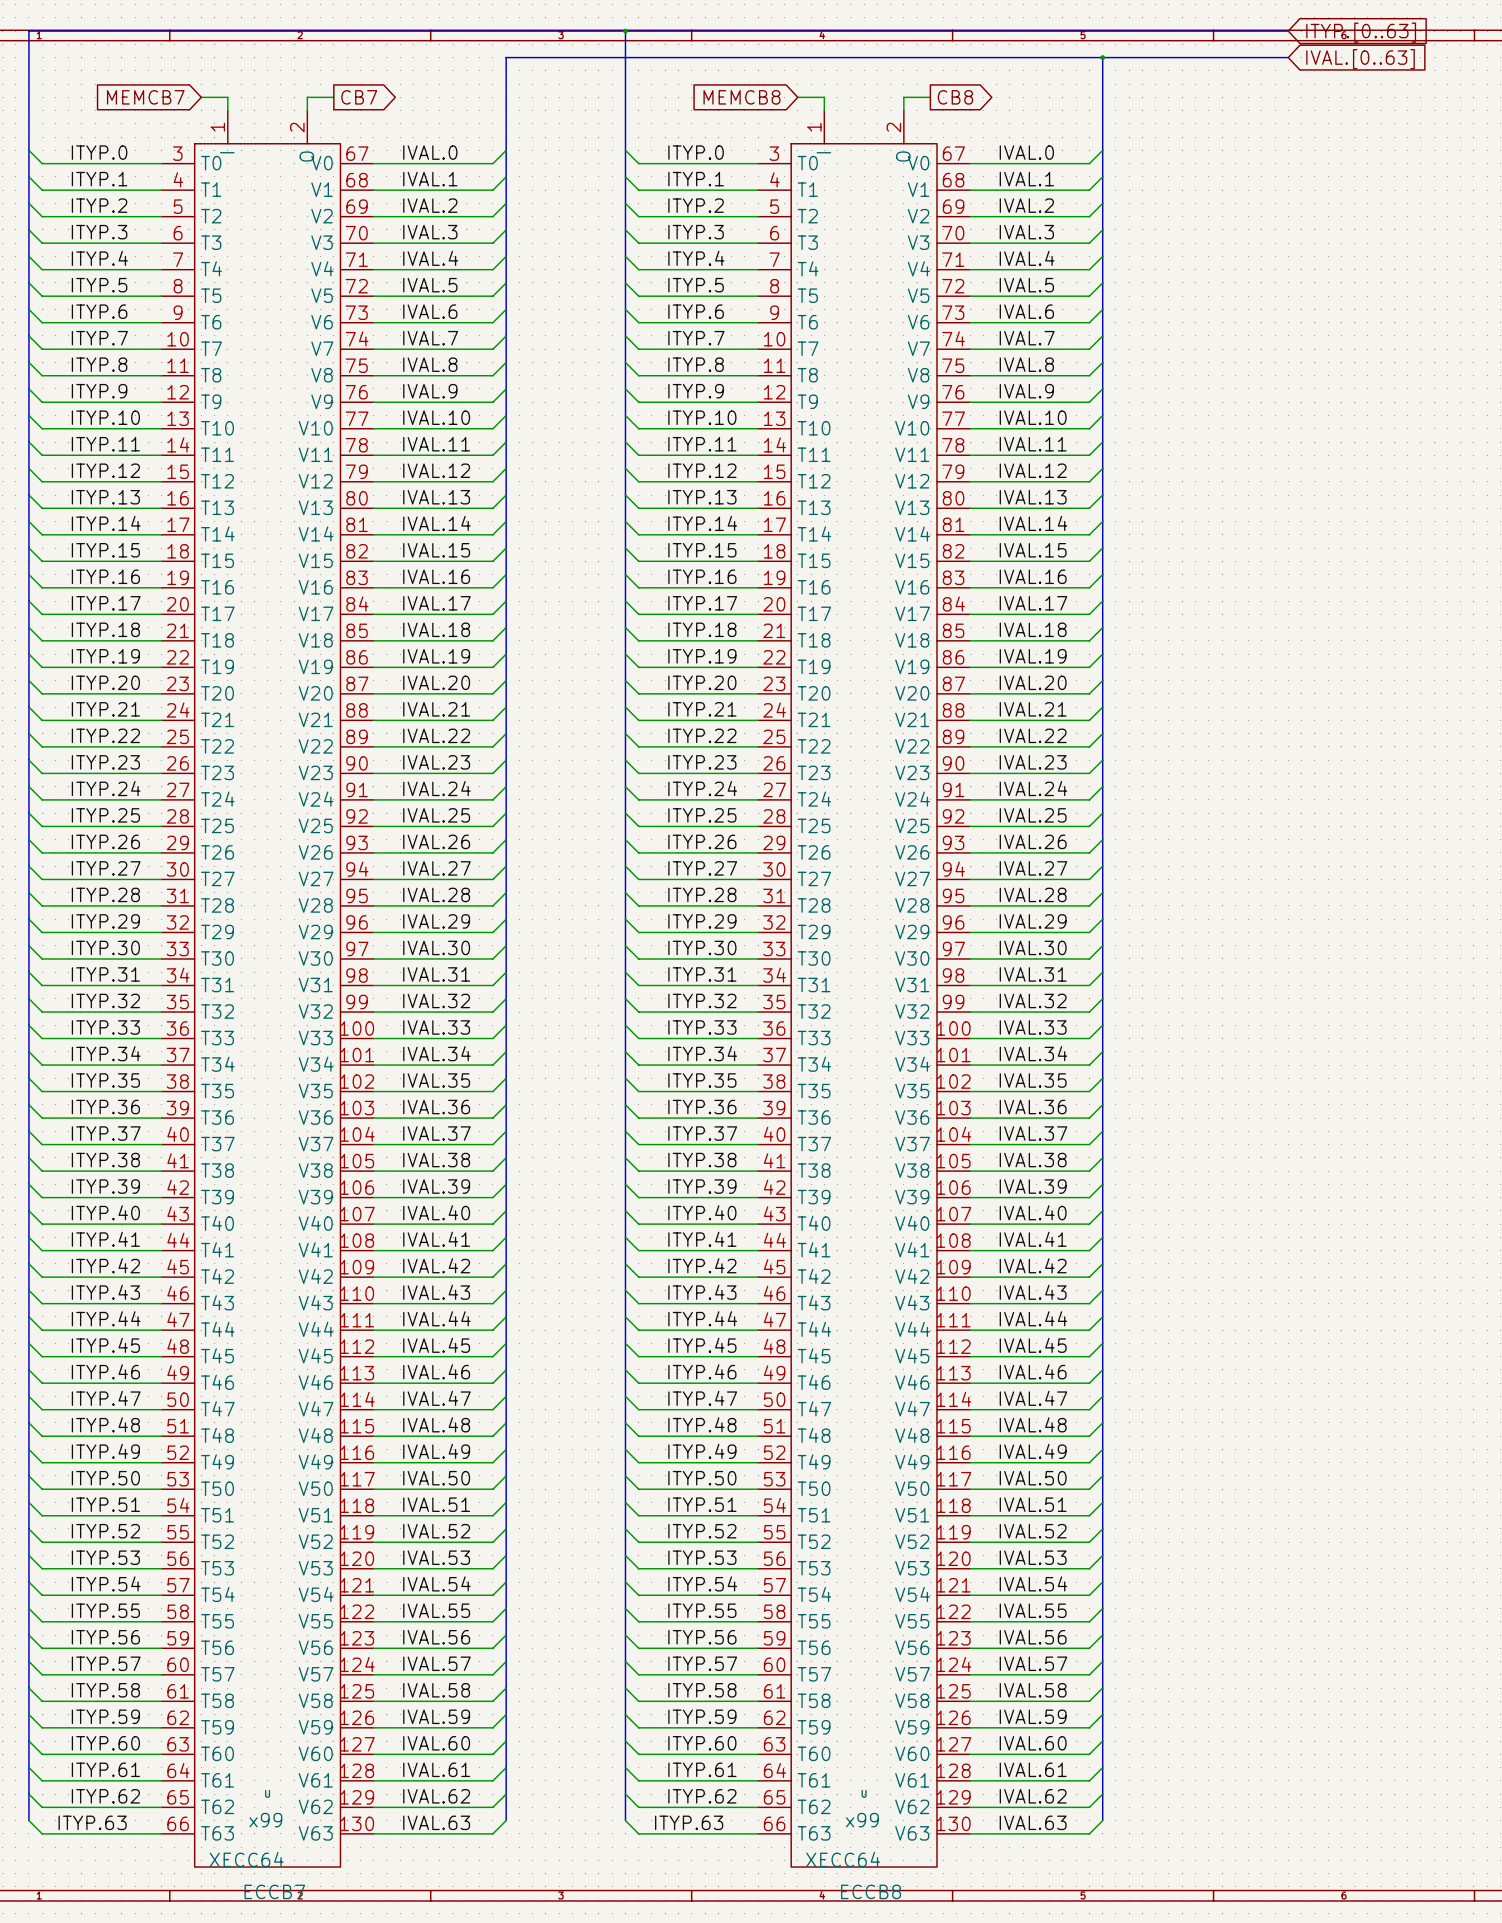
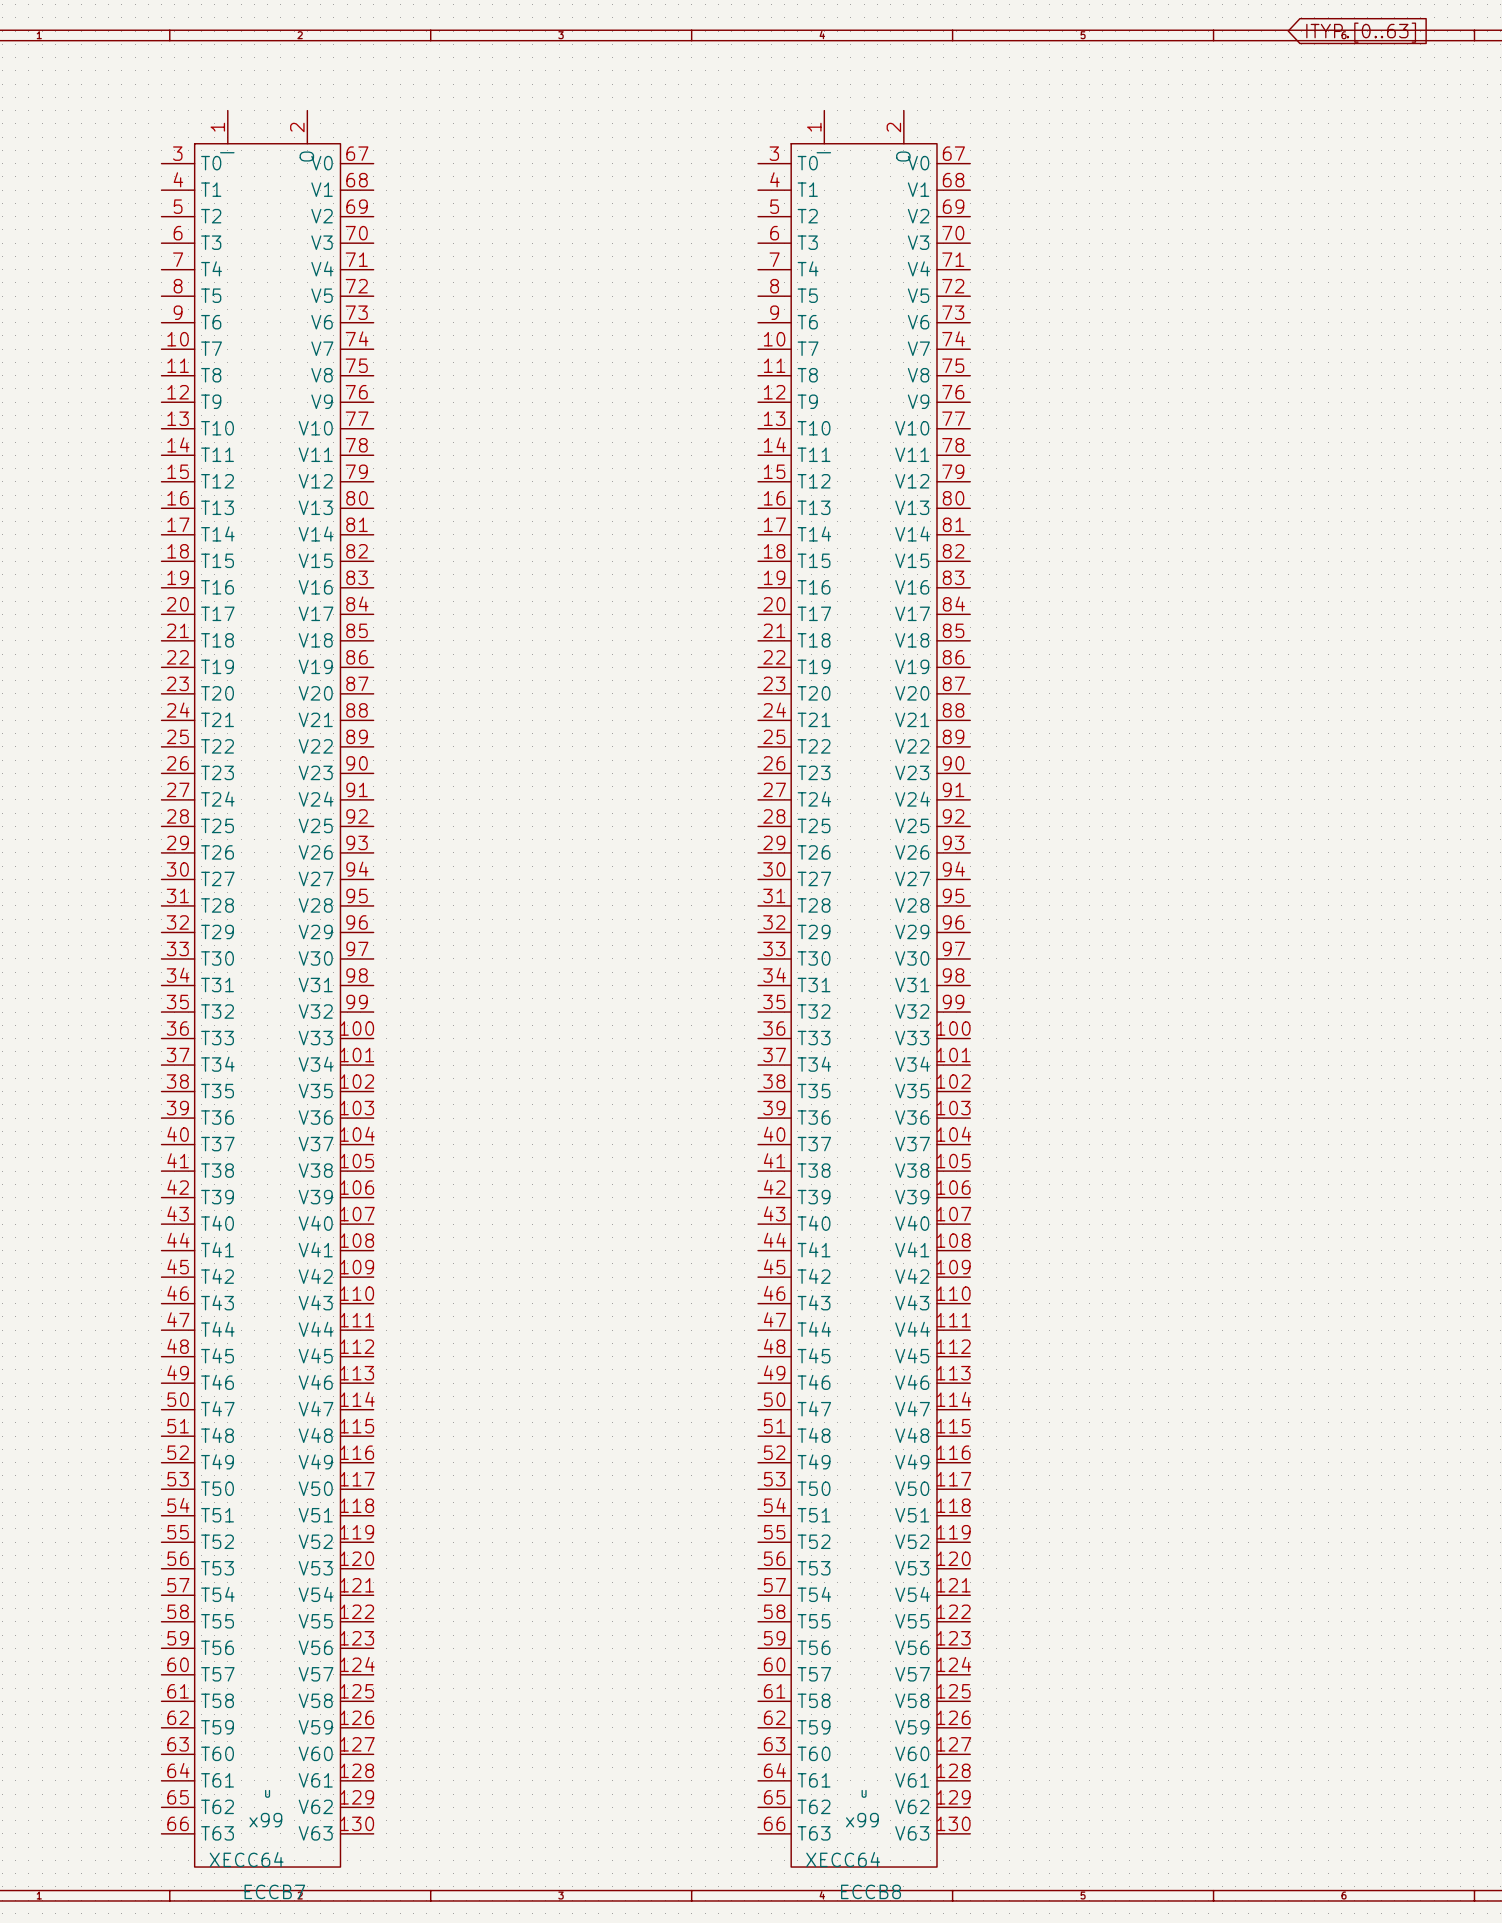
bus: (625, 31) (625, 1820) -> none
junction: (625, 31) -> none
bus: (1288, 31) (28, 31) (28, 1820) -> none
bus: (1102, 57) (1102, 1820) -> none
junction: (1102, 57) -> none
bus: (1288, 57) (506, 57) (506, 1820) -> none
global label: IVAL.[0..63] (1360, 59) -> none
global label: MEMCB7 (145, 97) -> none
wire: (201, 97) (227, 97) (227, 110) -> none
wire: (333, 97) (307, 97) (307, 110) -> none
global label: CB7 (359, 97) -> none
global label: MEMCB8 (741, 97) -> none
wire: (797, 97) (824, 97) (824, 110) -> none
wire: (930, 97) (903, 97) (903, 110) -> none
global label: CB8 (955, 97) -> none
wire: (28, 150) (42, 163) (161, 163) -> none
wire: (506, 150) (492, 163) (373, 163) -> none
wire: (625, 150) (638, 163) (758, 163) -> none
wire: (1102, 150) (1089, 163) (970, 163) -> none
label: ITYP.0 (99, 152) -> none
label: IVAL.0 (430, 152) -> none
label: ITYP.0 (696, 152) -> none
label: IVAL.0 (1026, 152) -> none
wire: (28, 176) (42, 190) (161, 190) -> none
wire: (506, 176) (492, 190) (373, 190) -> none
wire: (625, 176) (638, 190) (758, 190) -> none
wire: (1102, 176) (1089, 190) (970, 190) -> none
label: ITYP.1 (99, 179) -> none
label: IVAL.1 (430, 179) -> none
label: ITYP.1 (696, 179) -> none
label: IVAL.1 (1026, 179) -> none
wire: (28, 203) (42, 216) (161, 216) -> none
wire: (506, 203) (492, 216) (373, 216) -> none
wire: (625, 203) (638, 216) (758, 216) -> none
wire: (1102, 203) (1089, 216) (970, 216) -> none
label: ITYP.2 (99, 205) -> none
label: IVAL.2 (430, 205) -> none
label: ITYP.2 (696, 205) -> none
label: IVAL.2 (1026, 205) -> none
wire: (28, 229) (42, 243) (161, 243) -> none
wire: (506, 229) (492, 243) (373, 243) -> none
wire: (625, 229) (638, 243) (758, 243) -> none
wire: (1102, 229) (1089, 243) (970, 243) -> none
label: ITYP.3 (99, 232) -> none
label: IVAL.3 (430, 232) -> none
label: ITYP.3 (696, 232) -> none
label: IVAL.3 (1026, 232) -> none
wire: (28, 256) (42, 269) (161, 269) -> none
wire: (506, 256) (492, 269) (373, 269) -> none
wire: (625, 256) (638, 269) (758, 269) -> none
wire: (1102, 256) (1089, 269) (970, 269) -> none
label: ITYP.4 (99, 258) -> none
label: IVAL.4 (430, 258) -> none
label: ITYP.4 (696, 258) -> none
label: IVAL.4 (1027, 258) -> none
wire: (28, 282) (42, 296) (161, 296) -> none
wire: (506, 282) (492, 296) (373, 296) -> none
wire: (625, 282) (638, 296) (758, 296) -> none
wire: (1102, 282) (1089, 296) (970, 296) -> none
label: ITYP.5 (99, 285) -> none
label: IVAL.5 (430, 285) -> none
label: ITYP.5 (696, 285) -> none
label: IVAL.5 (1026, 285) -> none
wire: (28, 309) (42, 322) (161, 322) -> none
wire: (506, 309) (492, 322) (373, 322) -> none
wire: (625, 309) (638, 322) (758, 322) -> none
wire: (1102, 309) (1089, 322) (970, 322) -> none
label: ITYP.6 (99, 311) -> none
label: IVAL.6 (430, 311) -> none
label: ITYP.6 (696, 311) -> none
label: IVAL.6 (1026, 311) -> none
wire: (28, 335) (42, 349) (161, 349) -> none
wire: (506, 335) (492, 349) (373, 349) -> none
wire: (625, 335) (638, 349) (758, 349) -> none
wire: (1102, 335) (1089, 349) (970, 349) -> none
label: ITYP.7 (99, 338) -> none
label: IVAL.7 (430, 338) -> none
label: ITYP.7 (696, 338) -> none
label: IVAL.7 (1027, 338) -> none
wire: (28, 362) (42, 375) (161, 375) -> none
wire: (506, 362) (492, 375) (373, 375) -> none
wire: (625, 362) (638, 375) (758, 375) -> none
wire: (1102, 362) (1089, 375) (970, 375) -> none
label: ITYP.8 (99, 364) -> none
label: IVAL.8 (430, 364) -> none
label: ITYP.8 (696, 364) -> none
label: IVAL.8 (1026, 364) -> none
wire: (28, 388) (42, 402) (161, 402) -> none
wire: (506, 388) (492, 402) (373, 402) -> none
wire: (625, 388) (638, 402) (758, 402) -> none
wire: (1102, 388) (1089, 402) (970, 402) -> none
label: ITYP.9 (99, 391) -> none
label: IVAL.9 (430, 391) -> none
label: ITYP.9 (696, 391) -> none
label: IVAL.9 (1026, 391) -> none
wire: (28, 415) (42, 428) (161, 428) -> none
wire: (506, 415) (492, 428) (373, 428) -> none
wire: (625, 415) (638, 428) (758, 428) -> none
wire: (1102, 415) (1089, 428) (970, 428) -> none
label: ITYP.10 (105, 417) -> none
label: IVAL.10 (436, 417) -> none
label: ITYP.10 (702, 417) -> none
label: IVAL.10 (1033, 417) -> none
wire: (28, 442) (42, 455) (161, 455) -> none
wire: (506, 442) (492, 455) (373, 455) -> none
wire: (625, 442) (638, 455) (758, 455) -> none
wire: (1102, 442) (1089, 455) (970, 455) -> none
label: ITYP.11 (105, 444) -> none
label: IVAL.11 (436, 444) -> none
label: ITYP.11 (702, 444) -> none
label: IVAL.11 (1033, 444) -> none
wire: (28, 468) (42, 481) (161, 481) -> none
wire: (506, 468) (492, 481) (373, 481) -> none
wire: (625, 468) (638, 481) (758, 481) -> none
wire: (1102, 468) (1089, 481) (970, 481) -> none
label: ITYP.12 (105, 470) -> none
label: IVAL.12 (436, 470) -> none
label: ITYP.12 (702, 470) -> none
label: IVAL.12 (1033, 470) -> none
wire: (28, 495) (42, 508) (161, 508) -> none
wire: (506, 495) (492, 508) (373, 508) -> none
wire: (625, 495) (638, 508) (758, 508) -> none
wire: (1102, 495) (1089, 508) (970, 508) -> none
label: ITYP.13 (105, 497) -> none
label: IVAL.13 (436, 497) -> none
label: ITYP.13 (702, 497) -> none
label: IVAL.13 (1033, 497) -> none
wire: (28, 521) (42, 534) (161, 534) -> none
wire: (506, 521) (492, 534) (373, 534) -> none
wire: (625, 521) (638, 534) (758, 534) -> none
wire: (1102, 521) (1089, 534) (970, 534) -> none
label: ITYP.14 (106, 523) -> none
label: IVAL.14 (436, 523) -> none
label: ITYP.14 (702, 523) -> none
label: IVAL.14 (1033, 523) -> none
wire: (28, 548) (42, 561) (161, 561) -> none
wire: (506, 548) (492, 561) (373, 561) -> none
wire: (625, 548) (638, 561) (758, 561) -> none
wire: (1102, 548) (1089, 561) (970, 561) -> none
label: ITYP.15 (105, 550) -> none
label: IVAL.15 (436, 550) -> none
label: ITYP.15 (702, 550) -> none
label: IVAL.15 (1033, 550) -> none
wire: (28, 574) (42, 587) (161, 587) -> none
wire: (506, 574) (492, 587) (373, 587) -> none
wire: (625, 574) (638, 587) (758, 587) -> none
wire: (1102, 574) (1089, 587) (970, 587) -> none
label: ITYP.16 (105, 576) -> none
label: IVAL.16 (436, 576) -> none
label: ITYP.16 (702, 576) -> none
label: IVAL.16 (1033, 576) -> none
wire: (28, 601) (42, 614) (161, 614) -> none
wire: (506, 601) (492, 614) (373, 614) -> none
wire: (625, 601) (638, 614) (758, 614) -> none
wire: (1102, 601) (1089, 614) (970, 614) -> none
label: ITYP.17 (106, 603) -> none
label: IVAL.17 (436, 603) -> none
label: ITYP.17 (702, 603) -> none
label: IVAL.17 (1033, 603) -> none
wire: (28, 627) (42, 640) (161, 640) -> none
wire: (506, 627) (492, 640) (373, 640) -> none
wire: (625, 627) (638, 640) (758, 640) -> none
wire: (1102, 627) (1089, 640) (970, 640) -> none
label: ITYP.18 (105, 629) -> none
label: IVAL.18 (436, 629) -> none
label: ITYP.18 (702, 629) -> none
label: IVAL.18 (1033, 629) -> none
wire: (28, 654) (42, 667) (161, 667) -> none
wire: (506, 654) (492, 667) (373, 667) -> none
wire: (625, 654) (638, 667) (758, 667) -> none
wire: (1102, 654) (1089, 667) (970, 667) -> none
label: ITYP.19 (105, 656) -> none
label: IVAL.19 (436, 656) -> none
label: ITYP.19 (702, 656) -> none
label: IVAL.19 (1033, 656) -> none
wire: (28, 680) (42, 693) (161, 693) -> none
wire: (506, 680) (492, 693) (373, 693) -> none
wire: (625, 680) (638, 693) (758, 693) -> none
wire: (1102, 680) (1089, 693) (970, 693) -> none
label: ITYP.20 (105, 682) -> none
label: IVAL.20 (436, 682) -> none
label: ITYP.20 (702, 682) -> none
label: IVAL.20 (1033, 682) -> none
wire: (28, 707) (42, 720) (161, 720) -> none
wire: (506, 707) (492, 720) (373, 720) -> none
wire: (625, 707) (638, 720) (758, 720) -> none
wire: (1102, 707) (1089, 720) (970, 720) -> none
label: ITYP.21 (105, 709) -> none
label: IVAL.21 (436, 709) -> none
label: ITYP.21 (702, 709) -> none
label: IVAL.21 (1033, 709) -> none
wire: (28, 733) (42, 746) (161, 746) -> none
wire: (506, 733) (492, 746) (373, 746) -> none
wire: (625, 733) (638, 746) (758, 746) -> none
wire: (1102, 733) (1089, 746) (970, 746) -> none
label: ITYP.22 (105, 735) -> none
label: IVAL.22 (436, 735) -> none
label: ITYP.22 (702, 735) -> none
label: IVAL.22 (1033, 735) -> none
wire: (28, 760) (42, 773) (161, 773) -> none
wire: (506, 760) (492, 773) (373, 773) -> none
wire: (625, 760) (638, 773) (758, 773) -> none
wire: (1102, 760) (1089, 773) (970, 773) -> none
label: ITYP.23 (105, 762) -> none
label: IVAL.23 (436, 762) -> none
label: ITYP.23 (702, 762) -> none
label: IVAL.23 (1033, 762) -> none
wire: (28, 786) (42, 799) (161, 799) -> none
wire: (506, 786) (492, 799) (373, 799) -> none
wire: (625, 786) (638, 799) (758, 799) -> none
wire: (1102, 786) (1089, 799) (970, 799) -> none
label: ITYP.24 (106, 788) -> none
label: IVAL.24 (436, 788) -> none
label: ITYP.24 (702, 788) -> none
label: IVAL.24 (1033, 788) -> none
wire: (28, 813) (42, 826) (161, 826) -> none
wire: (506, 813) (492, 826) (373, 826) -> none
wire: (625, 813) (638, 826) (758, 826) -> none
wire: (1102, 813) (1089, 826) (970, 826) -> none
label: ITYP.25 (105, 815) -> none
label: IVAL.25 (436, 815) -> none
label: ITYP.25 (702, 815) -> none
label: IVAL.25 (1033, 815) -> none
wire: (28, 839) (42, 852) (161, 852) -> none
wire: (506, 839) (492, 852) (373, 852) -> none
wire: (625, 839) (638, 852) (758, 852) -> none
wire: (1102, 839) (1089, 852) (970, 852) -> none
label: ITYP.26 (105, 841) -> none
label: IVAL.26 (436, 841) -> none
label: ITYP.26 (702, 841) -> none
label: IVAL.26 (1033, 841) -> none
wire: (28, 866) (42, 879) (161, 879) -> none
wire: (506, 866) (492, 879) (373, 879) -> none
wire: (625, 866) (638, 879) (758, 879) -> none
wire: (1102, 866) (1089, 879) (970, 879) -> none
label: ITYP.27 (106, 868) -> none
label: IVAL.27 (436, 868) -> none
label: ITYP.27 (702, 868) -> none
label: IVAL.27 (1033, 868) -> none
wire: (28, 892) (42, 905) (161, 905) -> none
wire: (506, 892) (492, 905) (373, 905) -> none
wire: (625, 892) (638, 905) (758, 905) -> none
wire: (1102, 892) (1089, 905) (970, 905) -> none
label: ITYP.28 (105, 894) -> none
label: IVAL.28 (436, 894) -> none
label: ITYP.28 (702, 894) -> none
label: IVAL.28 (1033, 894) -> none
wire: (28, 919) (42, 932) (161, 932) -> none
wire: (506, 919) (492, 932) (373, 932) -> none
wire: (625, 919) (638, 932) (758, 932) -> none
wire: (1102, 919) (1089, 932) (970, 932) -> none
label: ITYP.29 (105, 921) -> none
label: IVAL.29 (436, 921) -> none
label: ITYP.29 (702, 921) -> none
label: IVAL.29 (1033, 921) -> none
wire: (28, 945) (42, 958) (161, 958) -> none
wire: (506, 945) (492, 958) (373, 958) -> none
wire: (625, 945) (638, 958) (758, 958) -> none
wire: (1102, 945) (1089, 958) (970, 958) -> none
label: ITYP.30 (105, 947) -> none
label: IVAL.30 (436, 947) -> none
label: ITYP.30 (702, 947) -> none
label: IVAL.30 (1033, 947) -> none
wire: (28, 972) (42, 985) (161, 985) -> none
wire: (506, 972) (492, 985) (373, 985) -> none
wire: (625, 972) (638, 985) (758, 985) -> none
wire: (1102, 972) (1089, 985) (970, 985) -> none
label: ITYP.31 (105, 974) -> none
label: IVAL.31 (436, 974) -> none
label: ITYP.31 (702, 974) -> none
label: IVAL.31 (1033, 974) -> none
wire: (28, 998) (42, 1012) (161, 1012) -> none
wire: (506, 998) (492, 1012) (373, 1012) -> none
wire: (625, 998) (638, 1012) (758, 1012) -> none
wire: (1102, 998) (1089, 1012) (970, 1012) -> none
label: ITYP.32 (105, 1000) -> none
label: IVAL.32 (436, 1000) -> none
label: ITYP.32 (702, 1000) -> none
label: IVAL.32 (1033, 1000) -> none
wire: (28, 1025) (42, 1038) (161, 1038) -> none
wire: (506, 1025) (492, 1038) (373, 1038) -> none
wire: (625, 1025) (638, 1038) (758, 1038) -> none
wire: (1102, 1025) (1089, 1038) (970, 1038) -> none
label: ITYP.33 (105, 1027) -> none
label: IVAL.33 (436, 1027) -> none
label: ITYP.33 (702, 1027) -> none
label: IVAL.33 (1033, 1027) -> none
wire: (28, 1051) (42, 1065) (161, 1065) -> none
wire: (506, 1051) (492, 1065) (373, 1065) -> none
wire: (625, 1051) (638, 1065) (758, 1065) -> none
wire: (1102, 1051) (1089, 1065) (970, 1065) -> none
label: ITYP.34 (106, 1053) -> none
label: IVAL.34 (436, 1053) -> none
label: ITYP.34 (702, 1053) -> none
label: IVAL.34 (1033, 1053) -> none
wire: (28, 1078) (42, 1091) (161, 1091) -> none
wire: (506, 1078) (492, 1091) (373, 1091) -> none
wire: (625, 1078) (638, 1091) (758, 1091) -> none
wire: (1102, 1078) (1089, 1091) (970, 1091) -> none
label: ITYP.35 (105, 1080) -> none
label: IVAL.35 (436, 1080) -> none
label: ITYP.35 (702, 1080) -> none
label: IVAL.35 (1033, 1080) -> none
wire: (28, 1104) (42, 1118) (161, 1118) -> none
wire: (506, 1104) (492, 1118) (373, 1118) -> none
wire: (625, 1104) (638, 1118) (758, 1118) -> none
wire: (1102, 1104) (1089, 1118) (970, 1118) -> none
label: ITYP.36 (105, 1107) -> none
label: IVAL.36 (436, 1107) -> none
label: ITYP.36 (702, 1107) -> none
label: IVAL.36 (1033, 1107) -> none
wire: (28, 1131) (42, 1144) (161, 1144) -> none
wire: (506, 1131) (492, 1144) (373, 1144) -> none
wire: (625, 1131) (638, 1144) (758, 1144) -> none
wire: (1102, 1131) (1089, 1144) (970, 1144) -> none
label: ITYP.37 (106, 1133) -> none
label: IVAL.37 (436, 1133) -> none
label: ITYP.37 (702, 1133) -> none
label: IVAL.37 (1033, 1133) -> none
wire: (28, 1157) (42, 1171) (161, 1171) -> none
wire: (506, 1157) (492, 1171) (373, 1171) -> none
wire: (625, 1157) (638, 1171) (758, 1171) -> none
wire: (1102, 1157) (1089, 1171) (970, 1171) -> none
label: ITYP.38 (105, 1160) -> none
label: IVAL.38 (436, 1160) -> none
label: ITYP.38 (702, 1160) -> none
label: IVAL.38 (1033, 1160) -> none
wire: (28, 1184) (42, 1197) (161, 1197) -> none
wire: (506, 1184) (492, 1197) (373, 1197) -> none
wire: (625, 1184) (638, 1197) (758, 1197) -> none
wire: (1102, 1184) (1089, 1197) (970, 1197) -> none
label: ITYP.39 (105, 1186) -> none
label: IVAL.39 (436, 1186) -> none
label: ITYP.39 (702, 1186) -> none
label: IVAL.39 (1033, 1186) -> none
wire: (28, 1210) (42, 1224) (161, 1224) -> none
wire: (506, 1210) (492, 1224) (373, 1224) -> none
wire: (625, 1210) (638, 1224) (758, 1224) -> none
wire: (1102, 1210) (1089, 1224) (970, 1224) -> none
label: ITYP.40 (105, 1212) -> none
label: IVAL.40 (436, 1212) -> none
label: ITYP.40 (702, 1212) -> none
label: IVAL.40 (1033, 1212) -> none
wire: (28, 1237) (42, 1250) (161, 1250) -> none
wire: (506, 1237) (492, 1250) (373, 1250) -> none
wire: (625, 1237) (638, 1250) (758, 1250) -> none
wire: (1102, 1237) (1089, 1250) (970, 1250) -> none
label: ITYP.41 (105, 1239) -> none
label: IVAL.41 (436, 1239) -> none
label: ITYP.41 (702, 1239) -> none
label: IVAL.41 (1033, 1239) -> none
wire: (28, 1263) (42, 1277) (161, 1277) -> none
wire: (506, 1263) (492, 1277) (373, 1277) -> none
wire: (625, 1263) (638, 1277) (758, 1277) -> none
wire: (1102, 1263) (1089, 1277) (970, 1277) -> none
label: ITYP.42 (105, 1265) -> none
label: IVAL.42 (436, 1265) -> none
label: ITYP.42 (702, 1265) -> none
label: IVAL.42 (1033, 1265) -> none
wire: (28, 1290) (42, 1303) (161, 1303) -> none
wire: (506, 1290) (492, 1303) (373, 1303) -> none
wire: (625, 1290) (638, 1303) (758, 1303) -> none
wire: (1102, 1290) (1089, 1303) (970, 1303) -> none
label: ITYP.43 (105, 1292) -> none
label: IVAL.43 (436, 1292) -> none
label: ITYP.43 (702, 1292) -> none
label: IVAL.43 (1033, 1292) -> none
wire: (28, 1316) (42, 1330) (161, 1330) -> none
wire: (506, 1316) (492, 1330) (373, 1330) -> none
wire: (625, 1316) (638, 1330) (758, 1330) -> none
wire: (1102, 1316) (1089, 1330) (970, 1330) -> none
label: ITYP.44 (106, 1318) -> none
label: IVAL.44 (436, 1318) -> none
label: ITYP.44 (702, 1318) -> none
label: IVAL.44 (1033, 1318) -> none
wire: (28, 1343) (42, 1356) (161, 1356) -> none
wire: (506, 1343) (492, 1356) (373, 1356) -> none
wire: (625, 1343) (638, 1356) (758, 1356) -> none
wire: (1102, 1343) (1089, 1356) (970, 1356) -> none
label: ITYP.45 (105, 1345) -> none
label: IVAL.45 (436, 1345) -> none
label: ITYP.45 (702, 1345) -> none
label: IVAL.45 (1033, 1345) -> none
wire: (28, 1369) (42, 1383) (161, 1383) -> none
wire: (506, 1369) (492, 1383) (373, 1383) -> none
wire: (625, 1369) (638, 1383) (758, 1383) -> none
wire: (1102, 1369) (1089, 1383) (970, 1383) -> none
label: ITYP.46 (105, 1371) -> none
label: IVAL.46 (436, 1371) -> none
label: ITYP.46 (702, 1371) -> none
label: IVAL.46 (1033, 1371) -> none
wire: (28, 1396) (42, 1409) (161, 1409) -> none
wire: (506, 1396) (492, 1409) (373, 1409) -> none
wire: (625, 1396) (638, 1409) (758, 1409) -> none
wire: (1102, 1396) (1089, 1409) (970, 1409) -> none
label: ITYP.47 (106, 1398) -> none
label: IVAL.47 (436, 1398) -> none
label: ITYP.47 (702, 1398) -> none
label: IVAL.47 (1033, 1398) -> none
wire: (28, 1422) (42, 1436) (161, 1436) -> none
wire: (506, 1422) (492, 1436) (373, 1436) -> none
wire: (625, 1422) (638, 1436) (758, 1436) -> none
wire: (1102, 1422) (1089, 1436) (970, 1436) -> none
label: ITYP.48 (105, 1424) -> none
label: IVAL.48 (436, 1424) -> none
label: ITYP.48 (702, 1424) -> none
label: IVAL.48 (1033, 1424) -> none
wire: (28, 1449) (42, 1462) (161, 1462) -> none
wire: (506, 1449) (492, 1462) (373, 1462) -> none
wire: (625, 1449) (638, 1462) (758, 1462) -> none
wire: (1102, 1449) (1089, 1462) (970, 1462) -> none
label: ITYP.49 (105, 1451) -> none
label: IVAL.49 (436, 1451) -> none
label: ITYP.49 (702, 1451) -> none
label: IVAL.49 (1033, 1451) -> none
wire: (28, 1475) (42, 1489) (161, 1489) -> none
wire: (506, 1475) (492, 1489) (373, 1489) -> none
wire: (625, 1475) (638, 1489) (758, 1489) -> none
wire: (1102, 1475) (1089, 1489) (970, 1489) -> none
label: ITYP.50 (105, 1478) -> none
label: IVAL.50 (436, 1478) -> none
label: ITYP.50 (702, 1478) -> none
label: IVAL.50 (1033, 1478) -> none
wire: (28, 1502) (42, 1515) (161, 1515) -> none
wire: (506, 1502) (492, 1515) (373, 1515) -> none
wire: (625, 1502) (638, 1515) (758, 1515) -> none
wire: (1102, 1502) (1089, 1515) (970, 1515) -> none
label: ITYP.51 (105, 1504) -> none
label: IVAL.51 (436, 1504) -> none
label: ITYP.51 (702, 1504) -> none
label: IVAL.51 (1033, 1504) -> none
wire: (28, 1528) (42, 1542) (161, 1542) -> none
wire: (506, 1528) (492, 1542) (373, 1542) -> none
wire: (625, 1528) (638, 1542) (758, 1542) -> none
wire: (1102, 1528) (1089, 1542) (970, 1542) -> none
label: ITYP.52 (105, 1531) -> none
label: IVAL.52 (436, 1531) -> none
label: ITYP.52 (702, 1531) -> none
label: IVAL.52 (1033, 1531) -> none
wire: (28, 1555) (42, 1568) (161, 1568) -> none
wire: (506, 1555) (492, 1568) (373, 1568) -> none
wire: (625, 1555) (638, 1568) (758, 1568) -> none
wire: (1102, 1555) (1089, 1568) (970, 1568) -> none
label: ITYP.53 (105, 1557) -> none
label: IVAL.53 (436, 1557) -> none
label: ITYP.53 (702, 1557) -> none
label: IVAL.53 (1033, 1557) -> none
wire: (28, 1582) (42, 1595) (161, 1595) -> none
wire: (506, 1582) (492, 1595) (373, 1595) -> none
wire: (625, 1582) (638, 1595) (758, 1595) -> none
wire: (1102, 1582) (1089, 1595) (970, 1595) -> none
label: ITYP.54 (106, 1583) -> none
label: IVAL.54 (436, 1583) -> none
label: ITYP.54 (702, 1583) -> none
label: IVAL.54 (1033, 1583) -> none
wire: (28, 1608) (42, 1621) (161, 1621) -> none
wire: (506, 1608) (492, 1621) (373, 1621) -> none
wire: (625, 1608) (638, 1621) (758, 1621) -> none
wire: (1102, 1608) (1089, 1621) (970, 1621) -> none
label: ITYP.55 (105, 1610) -> none
label: IVAL.55 (436, 1610) -> none
label: ITYP.55 (702, 1610) -> none
label: IVAL.55 (1033, 1610) -> none
wire: (28, 1635) (42, 1648) (161, 1648) -> none
wire: (506, 1635) (492, 1648) (373, 1648) -> none
wire: (625, 1635) (638, 1648) (758, 1648) -> none
wire: (1102, 1635) (1089, 1648) (970, 1648) -> none
label: ITYP.56 (105, 1637) -> none
label: IVAL.56 (436, 1637) -> none
label: ITYP.56 (702, 1637) -> none
label: IVAL.56 (1033, 1637) -> none
wire: (28, 1661) (42, 1674) (161, 1674) -> none
wire: (506, 1661) (492, 1674) (373, 1674) -> none
wire: (625, 1661) (638, 1674) (758, 1674) -> none
wire: (1102, 1661) (1089, 1674) (970, 1674) -> none
label: ITYP.57 (106, 1663) -> none
label: IVAL.57 (436, 1663) -> none
label: ITYP.57 (702, 1663) -> none
label: IVAL.57 (1033, 1663) -> none
wire: (28, 1688) (42, 1701) (161, 1701) -> none
wire: (506, 1688) (492, 1701) (373, 1701) -> none
wire: (625, 1688) (638, 1701) (758, 1701) -> none
wire: (1102, 1688) (1089, 1701) (970, 1701) -> none
label: ITYP.58 (105, 1690) -> none
label: IVAL.58 (436, 1690) -> none
label: ITYP.58 (702, 1690) -> none
label: IVAL.58 (1033, 1690) -> none
wire: (28, 1714) (42, 1727) (161, 1727) -> none
wire: (506, 1714) (492, 1727) (373, 1727) -> none
wire: (625, 1714) (638, 1727) (758, 1727) -> none
wire: (1102, 1714) (1089, 1727) (970, 1727) -> none
label: ITYP.59 (105, 1716) -> none
label: IVAL.59 (436, 1716) -> none
label: ITYP.59 (702, 1716) -> none
label: IVAL.59 (1033, 1716) -> none
wire: (28, 1741) (42, 1754) (161, 1754) -> none
wire: (506, 1741) (492, 1754) (373, 1754) -> none
wire: (625, 1741) (638, 1754) (758, 1754) -> none
wire: (1102, 1741) (1089, 1754) (970, 1754) -> none
label: ITYP.60 (105, 1743) -> none
label: IVAL.60 (436, 1743) -> none
label: ITYP.60 (702, 1743) -> none
label: IVAL.60 (1033, 1743) -> none
wire: (28, 1767) (42, 1780) (161, 1780) -> none
wire: (506, 1767) (492, 1780) (373, 1780) -> none
wire: (625, 1767) (638, 1780) (758, 1780) -> none
wire: (1102, 1767) (1089, 1780) (970, 1780) -> none
label: ITYP.61 (105, 1769) -> none
label: IVAL.61 (436, 1769) -> none
label: ITYP.61 (702, 1769) -> none
label: IVAL.61 (1033, 1769) -> none
wire: (28, 1794) (42, 1807) (161, 1807) -> none
wire: (506, 1794) (492, 1807) (373, 1807) -> none
wire: (625, 1794) (638, 1807) (758, 1807) -> none
wire: (1102, 1794) (1089, 1807) (970, 1807) -> none
label: ITYP.62 (105, 1796) -> none
label: IVAL.62 (436, 1796) -> none
label: ITYP.62 (702, 1796) -> none
label: IVAL.62 (1033, 1796) -> none
wire: (28, 1820) (42, 1833) (161, 1833) -> none
wire: (506, 1820) (492, 1833) (373, 1833) -> none
wire: (625, 1820) (638, 1833) (758, 1833) -> none
wire: (1102, 1820) (1089, 1833) (970, 1833) -> none
label: ITYP.63 (92, 1822) -> none
label: IVAL.63 (436, 1822) -> none
label: ITYP.63 (689, 1822) -> none
label: IVAL.63 (1033, 1822) -> none

